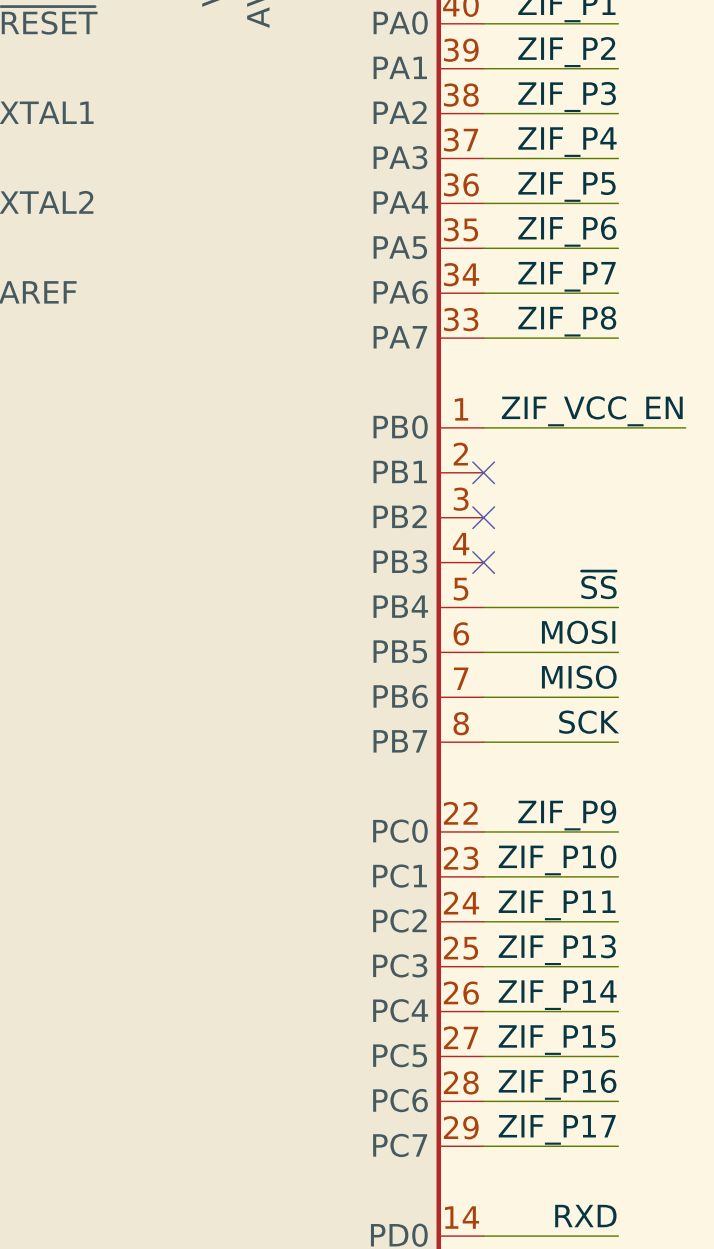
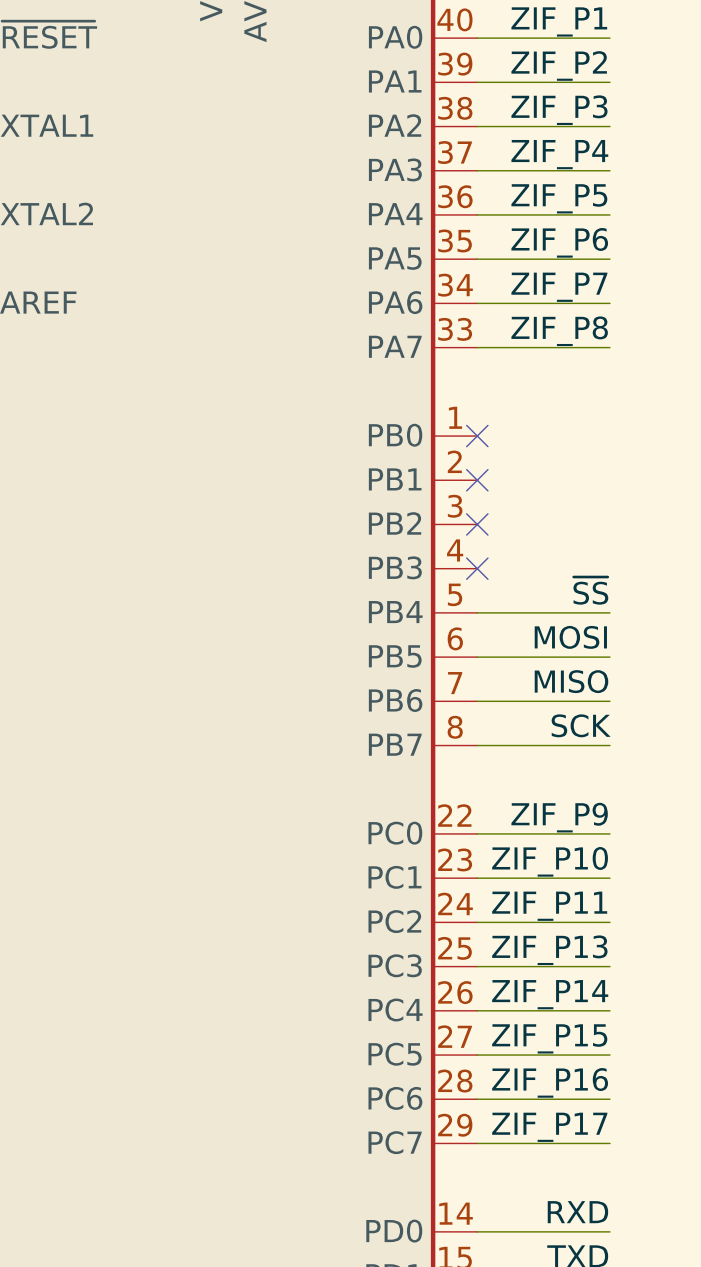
label: ZIF_VCC_EN (592, 411) -> none
wire: (483, 427) (685, 427) -> none
no-connect mark: none -> (477, 436)

